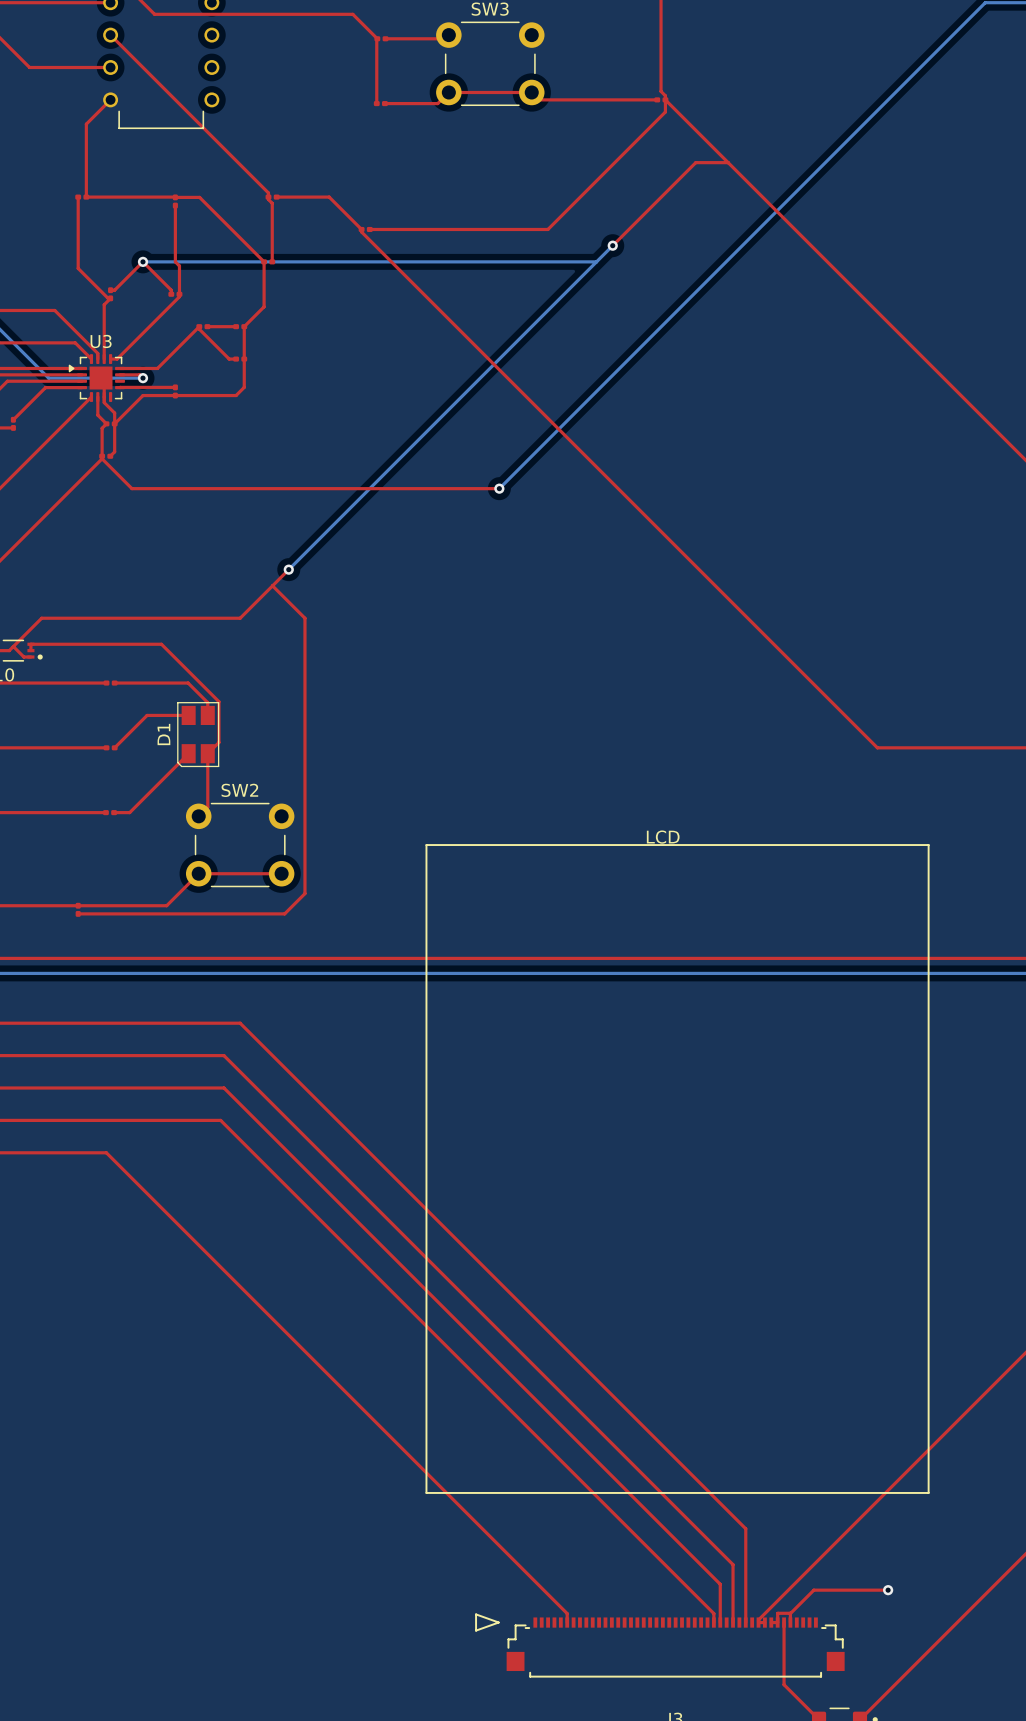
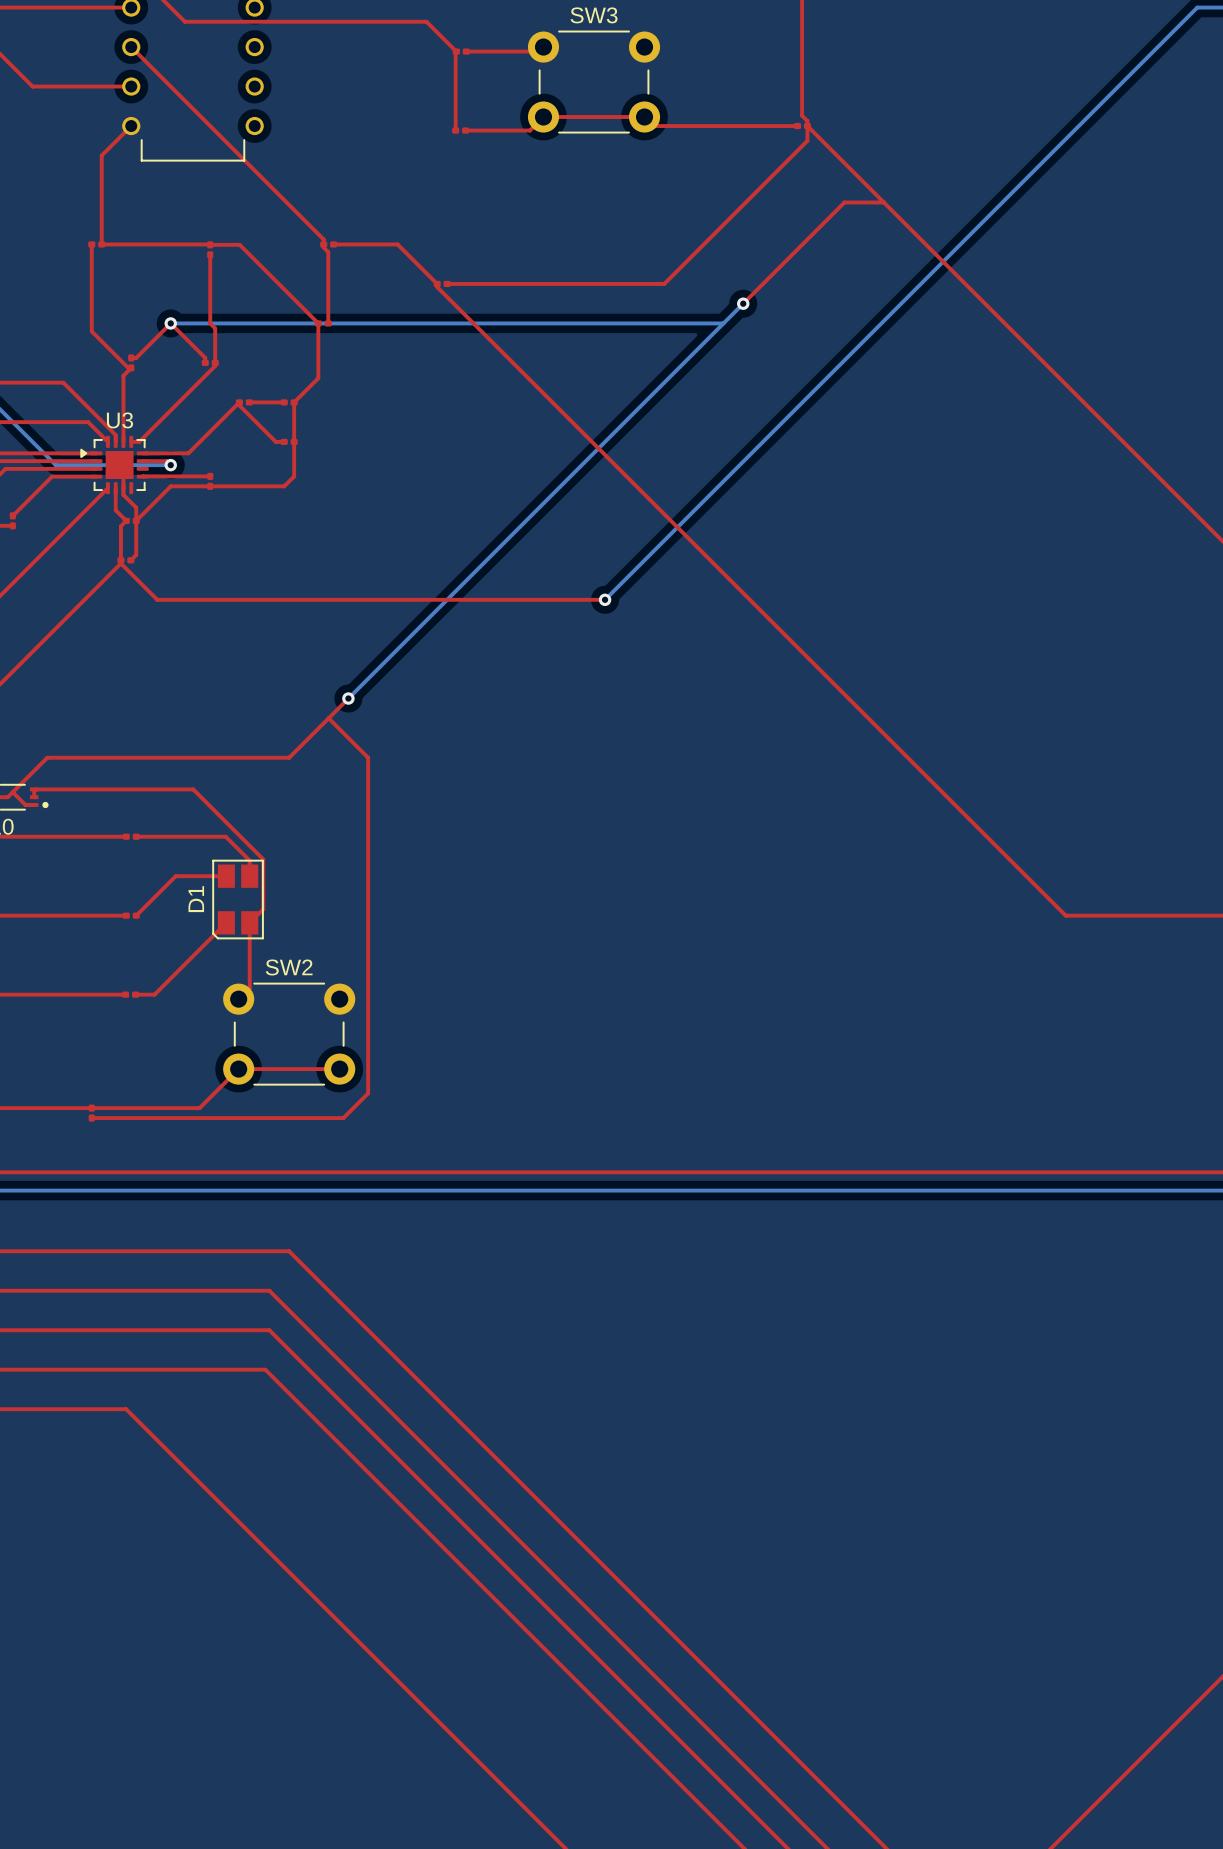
text: LCD (663, 837) -> none
line: (426, 845) (426, 1492) (928, 1492) (928, 845) (426, 845) -> none

